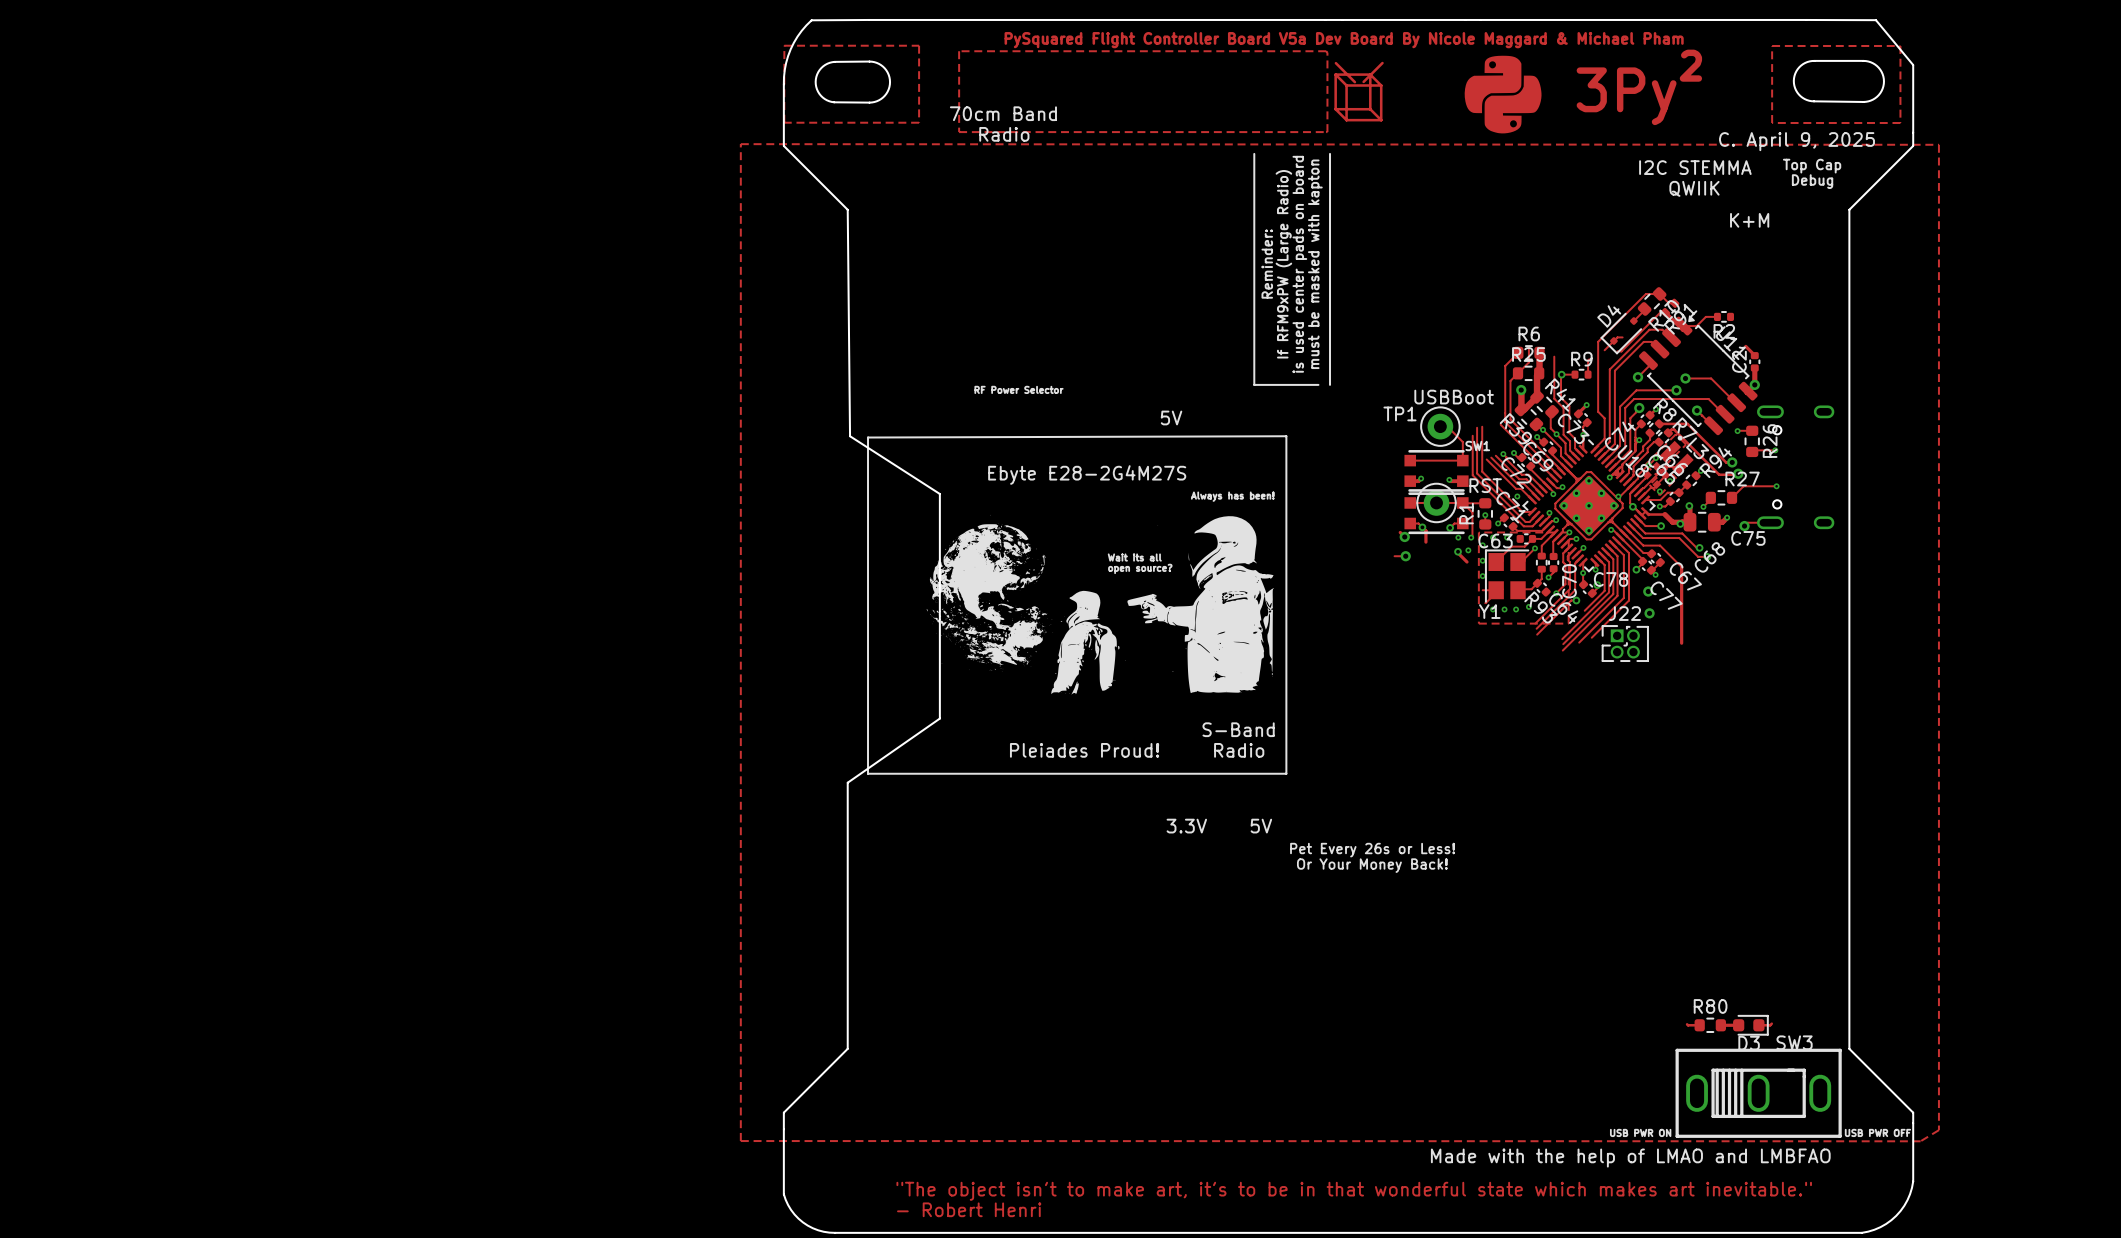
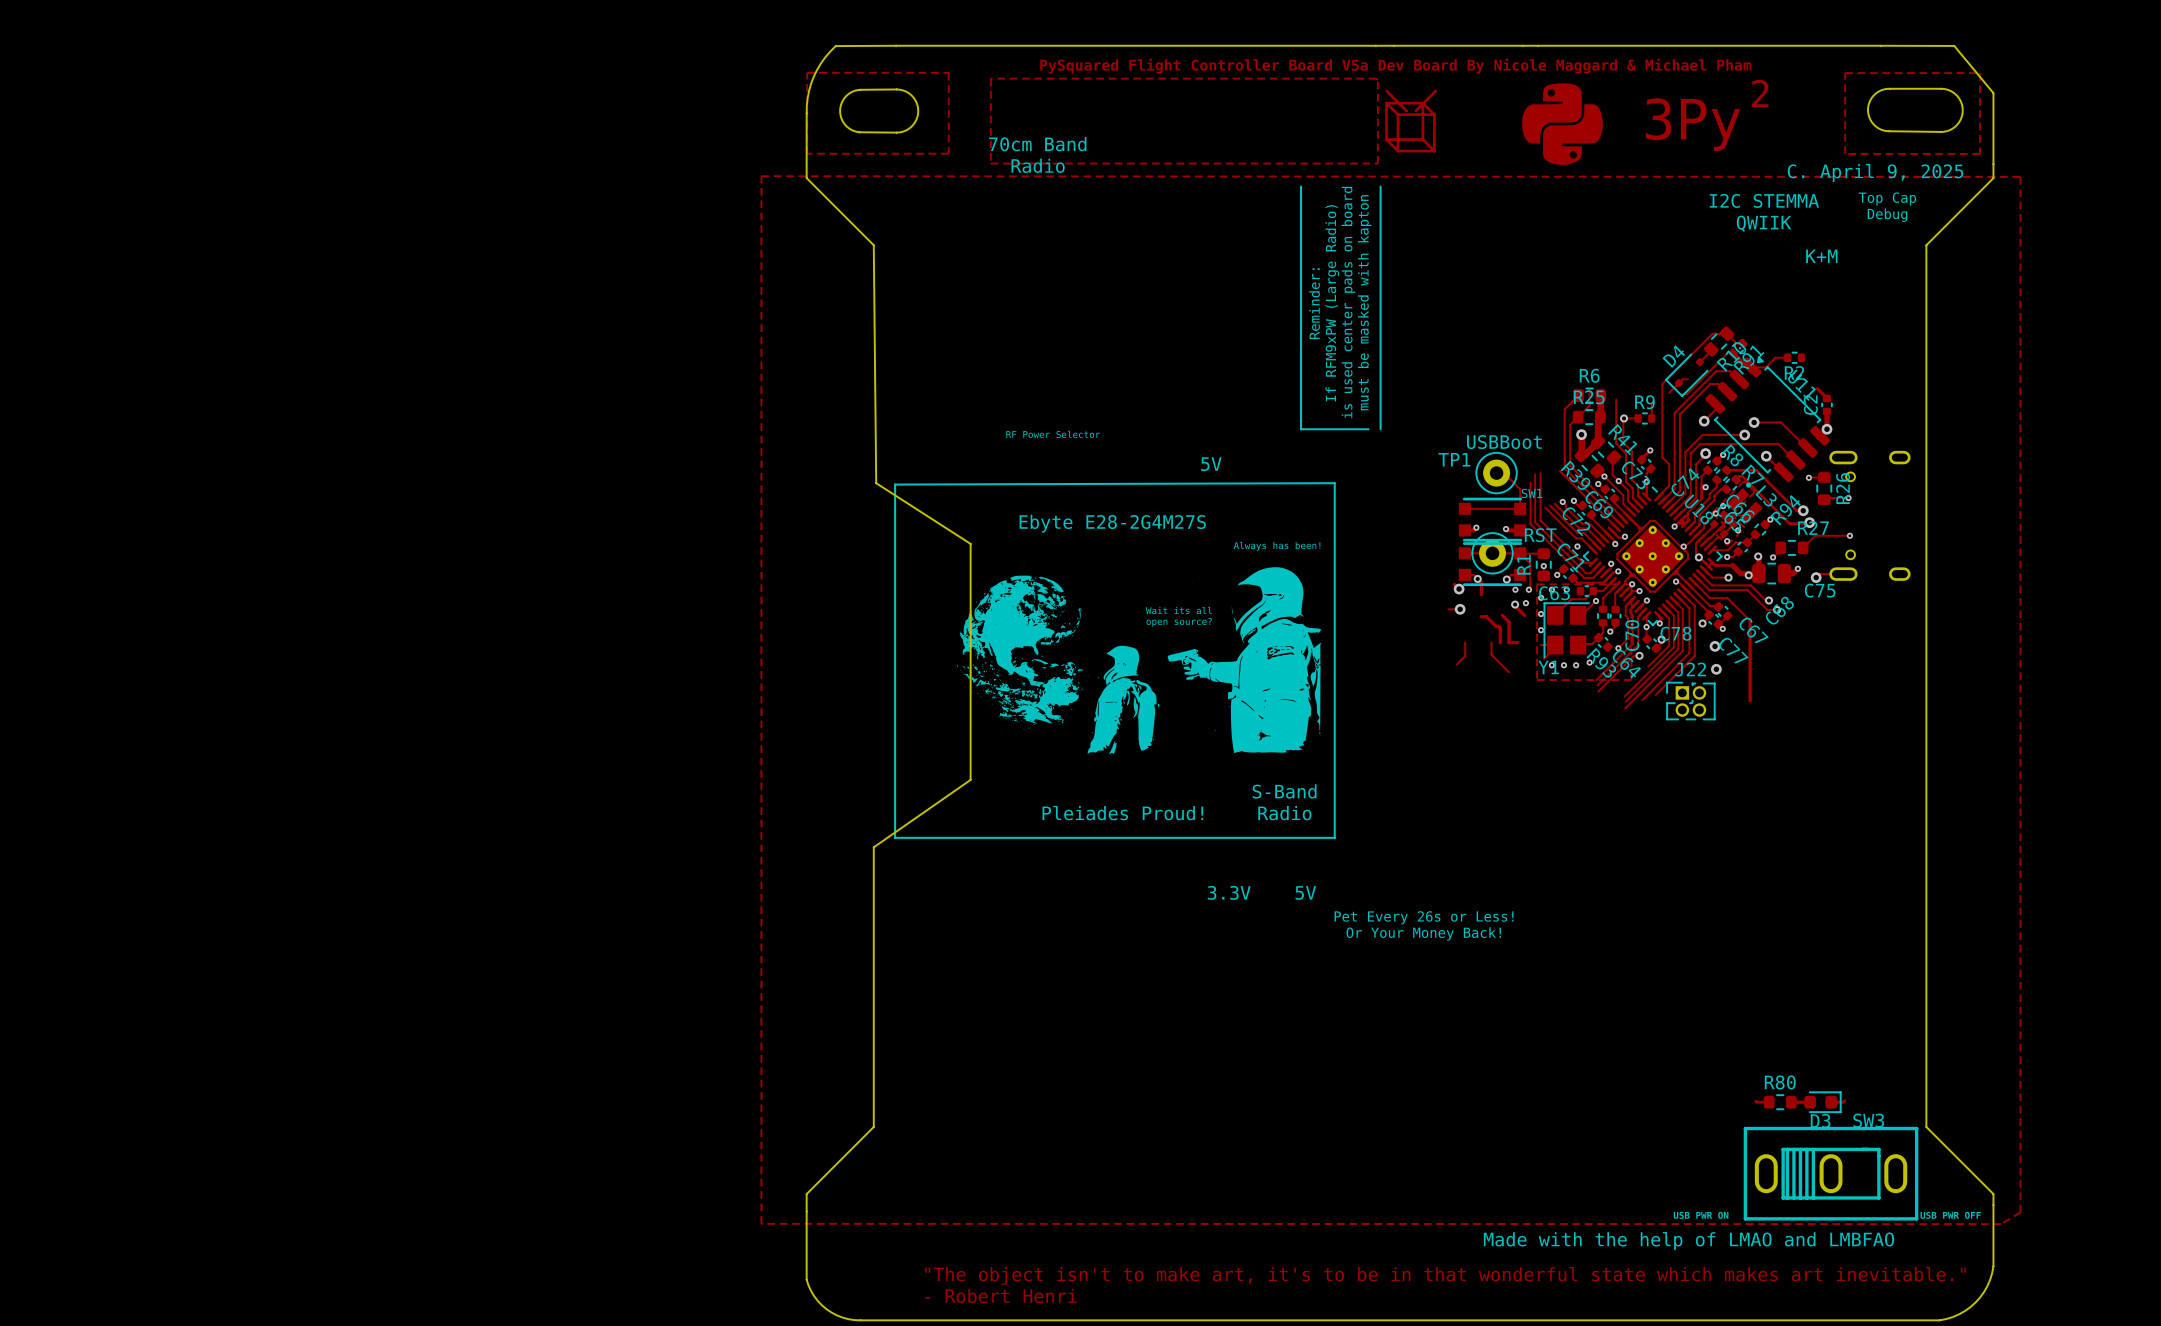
track: none -> (1502, 615) (1509, 622) (1509, 642) (1517, 642)
track: none -> (1481, 616) (1486, 616) (1496, 626) (1500, 627) (1500, 642)
track: none -> (1465, 642) (1465, 656) (1456, 664)
track: none -> (1491, 642) (1491, 654) (1509, 672)

